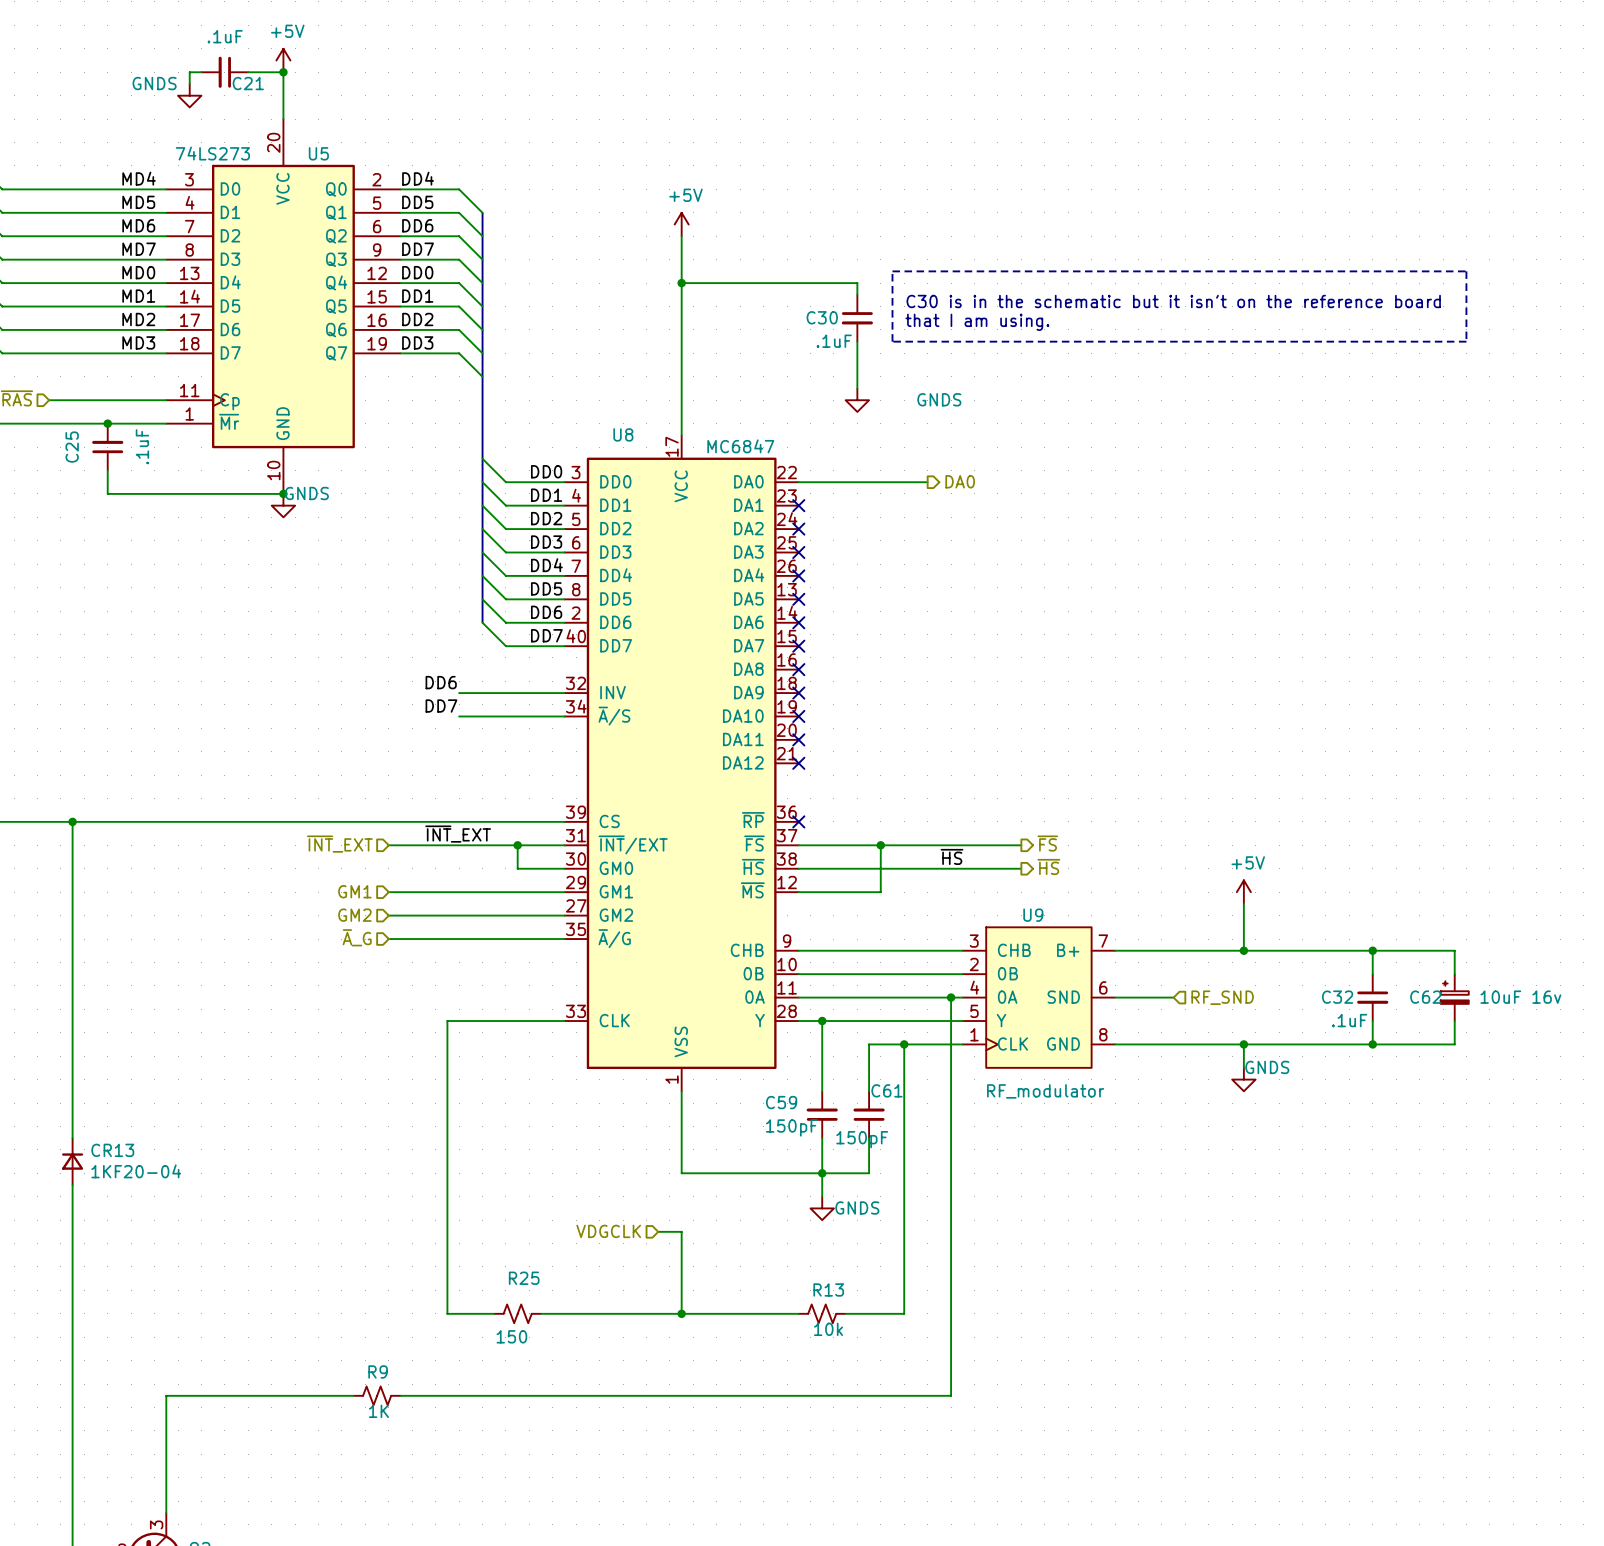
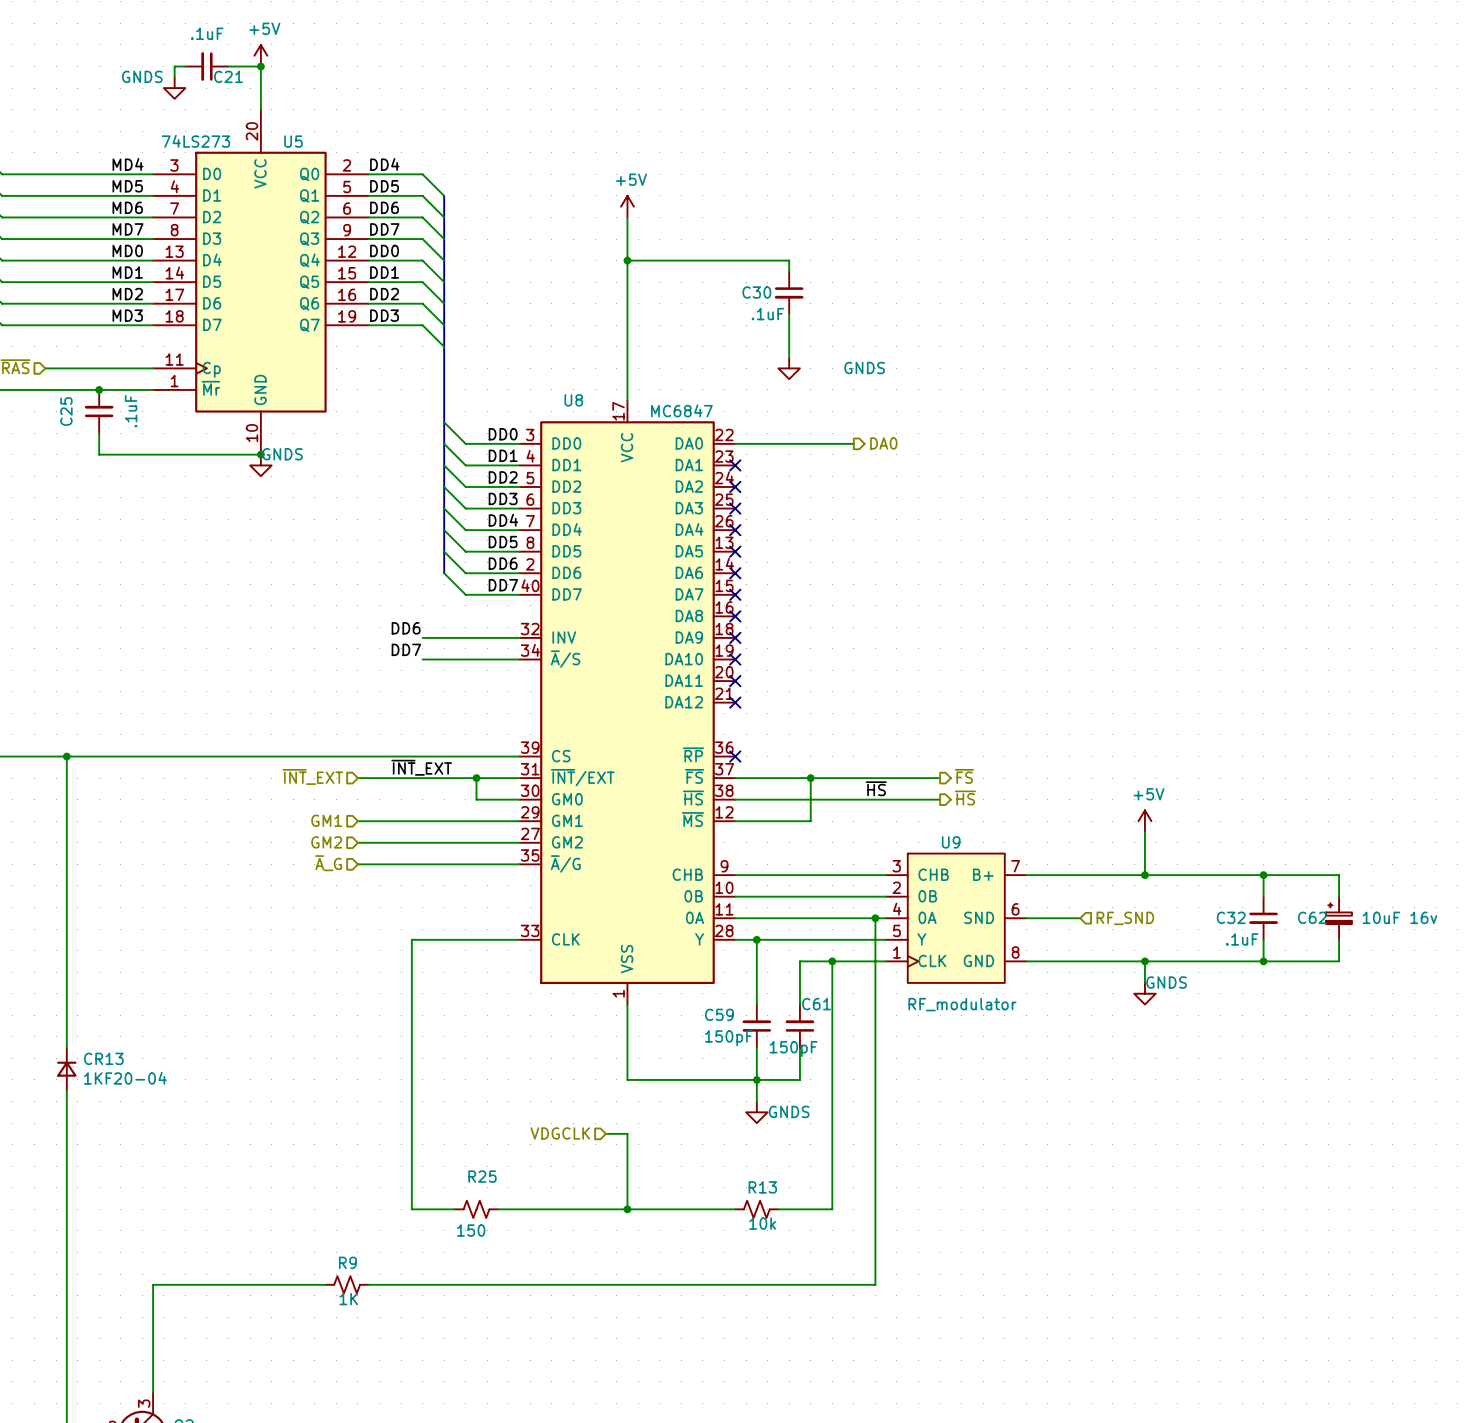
line: (892, 271) (1466, 271) (1466, 341) (892, 341) (892, 271) -> none
text: C30 is in the schematic but it isn't on the reference board (1173, 301) -> none
text: that I am using. (977, 322) -> none

